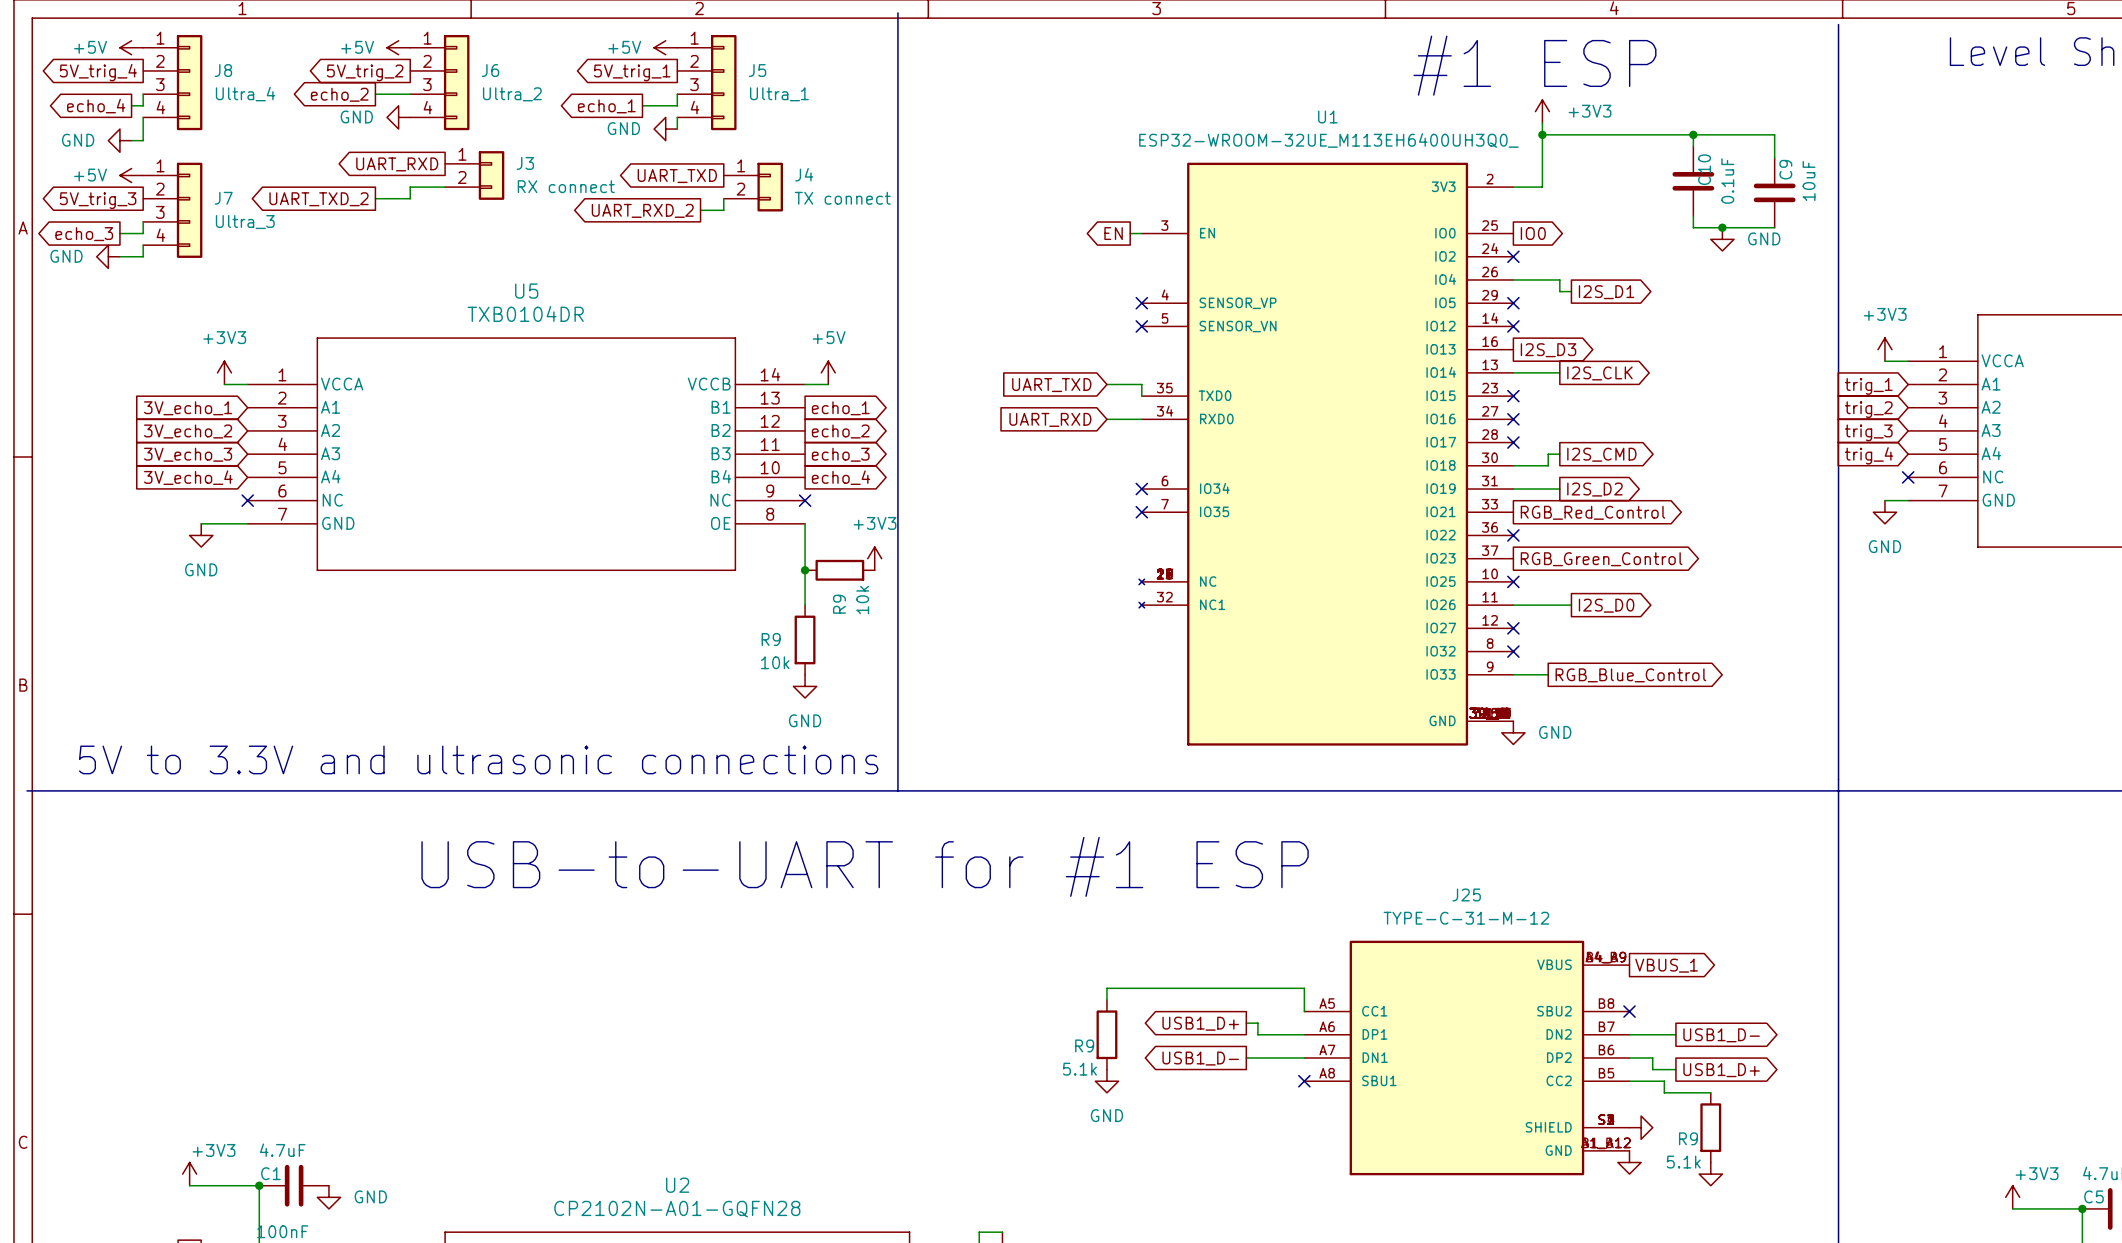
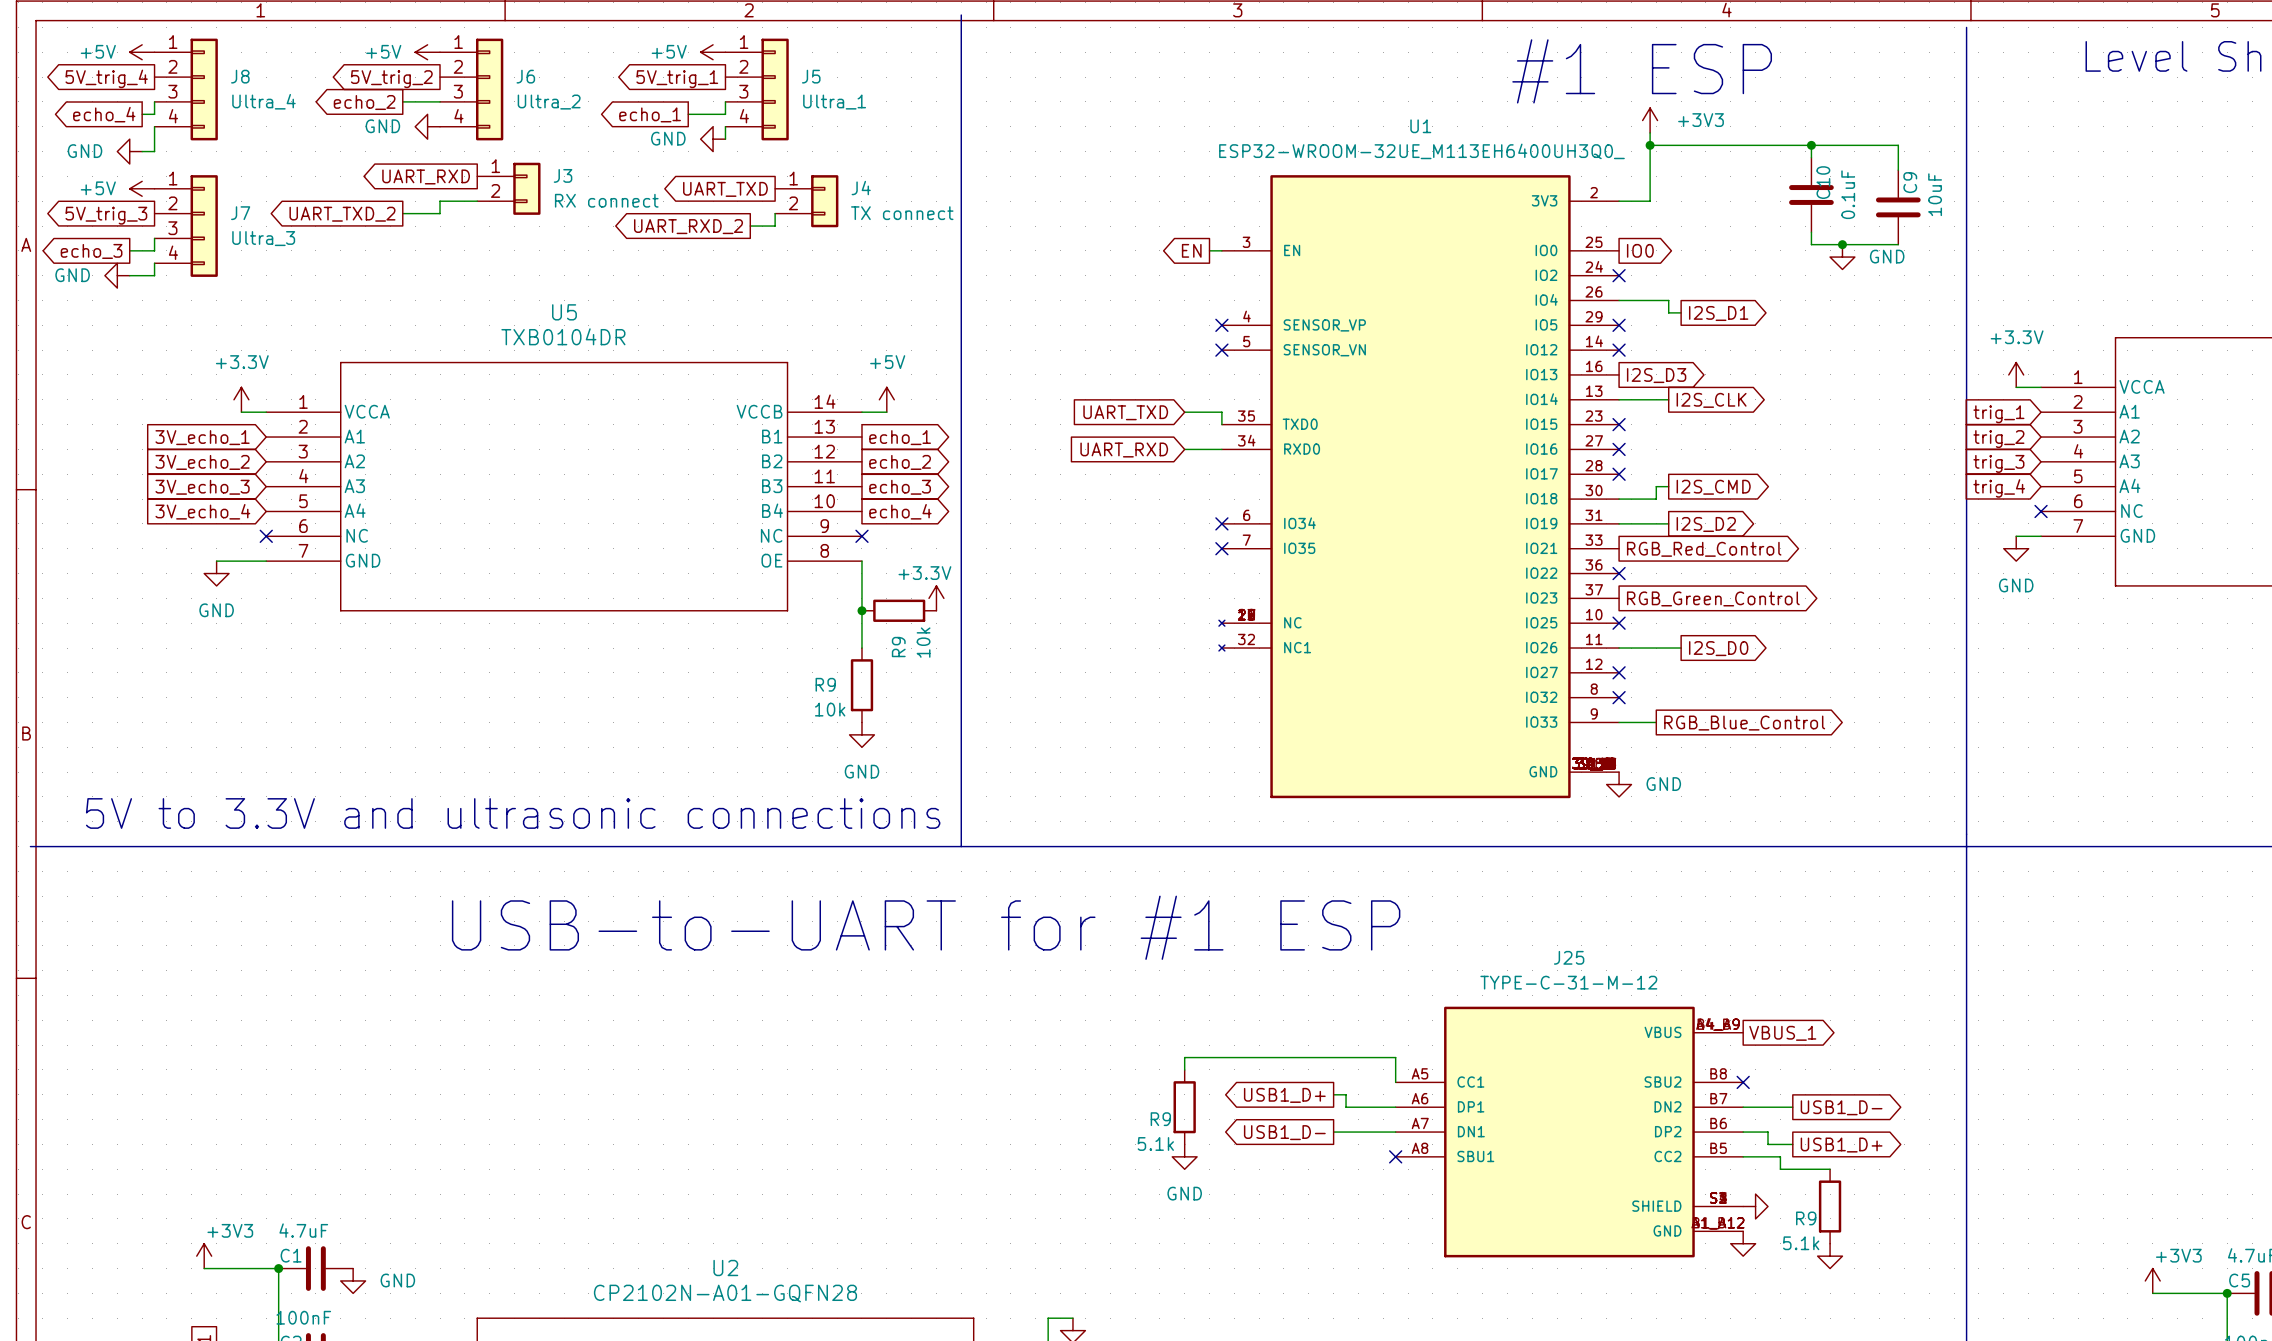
power symbol: +3V3 (1884, 349) -> +3.3V (2016, 374)
power symbol: +3V3 (224, 372) -> +3.3V (241, 399)
power symbol: +3V3 (874, 558) -> +3.3V (936, 598)

